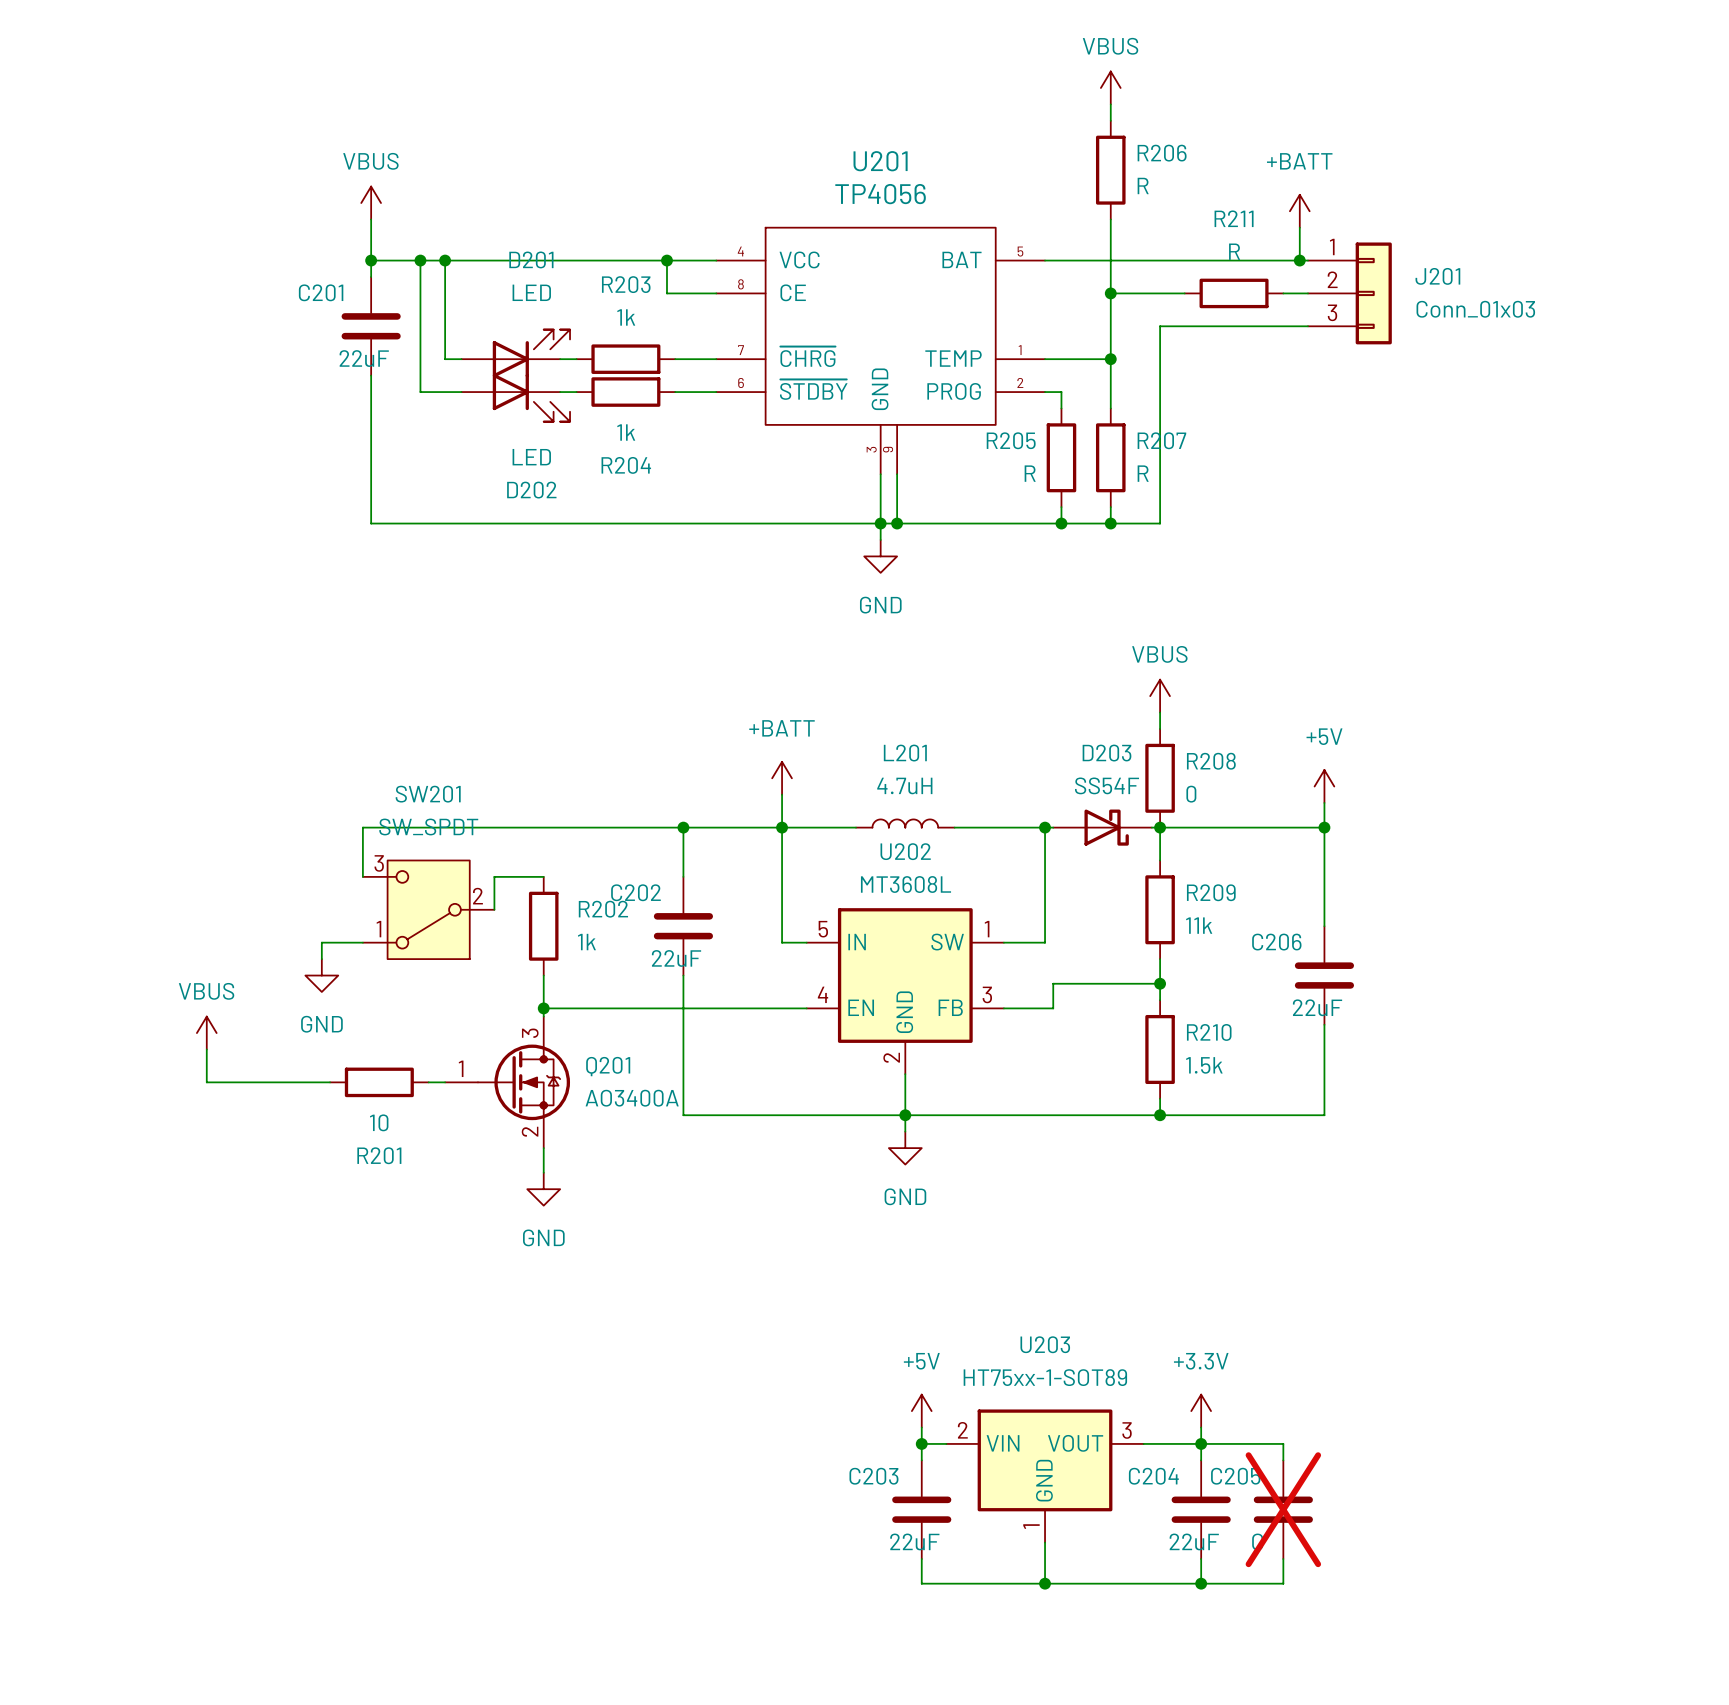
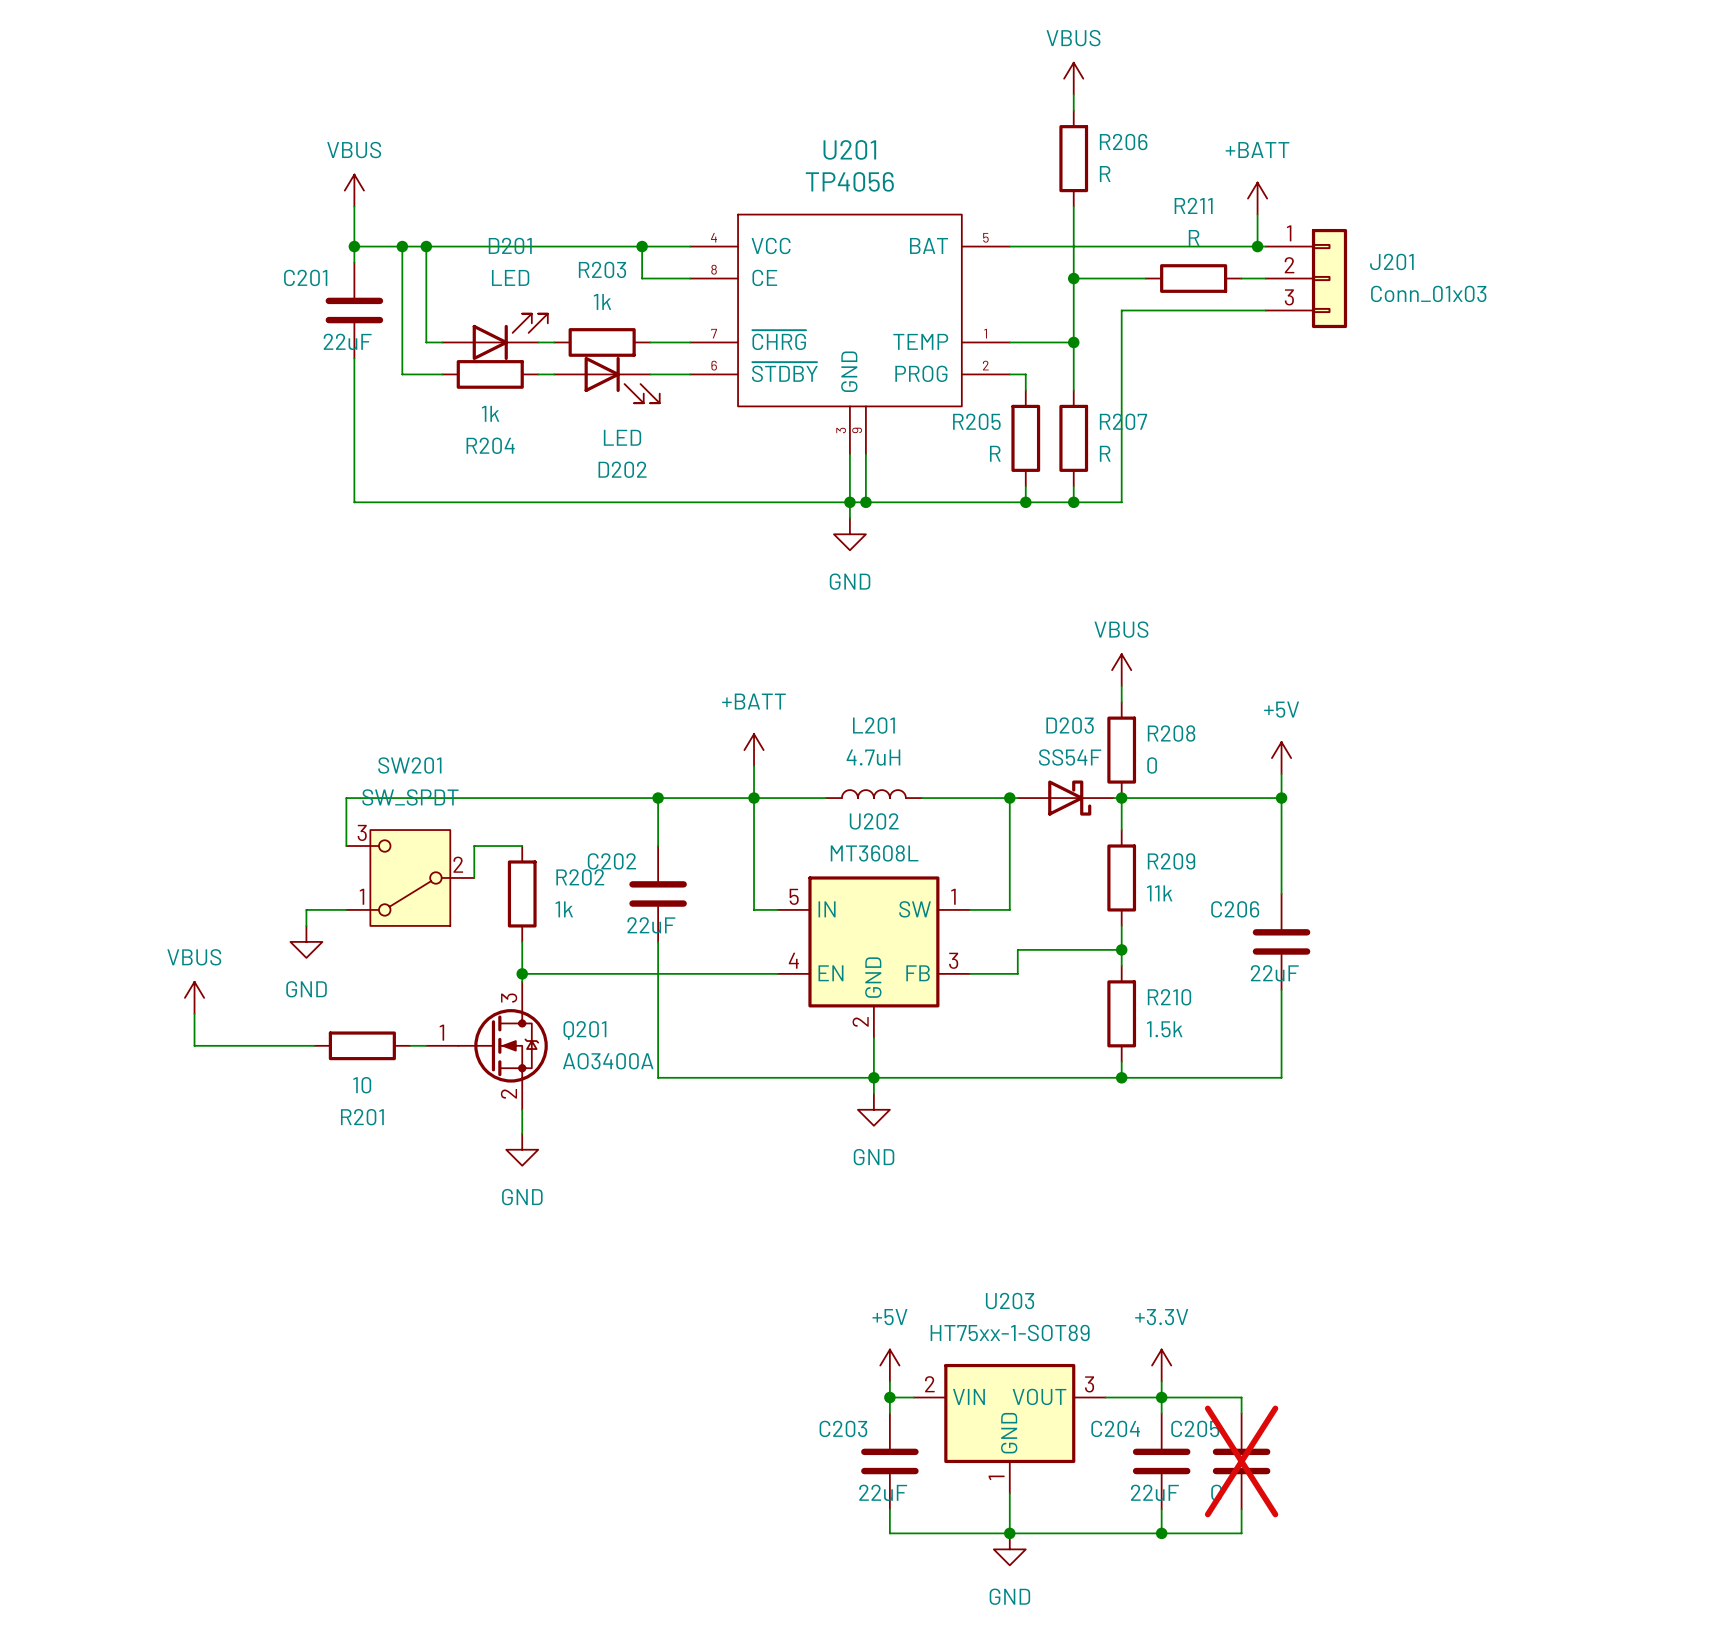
R204 position: (625, 392) -> (490, 374)
D202 position: (515, 397) -> (606, 380)
power symbol: none -> GND (1009, 1549)

